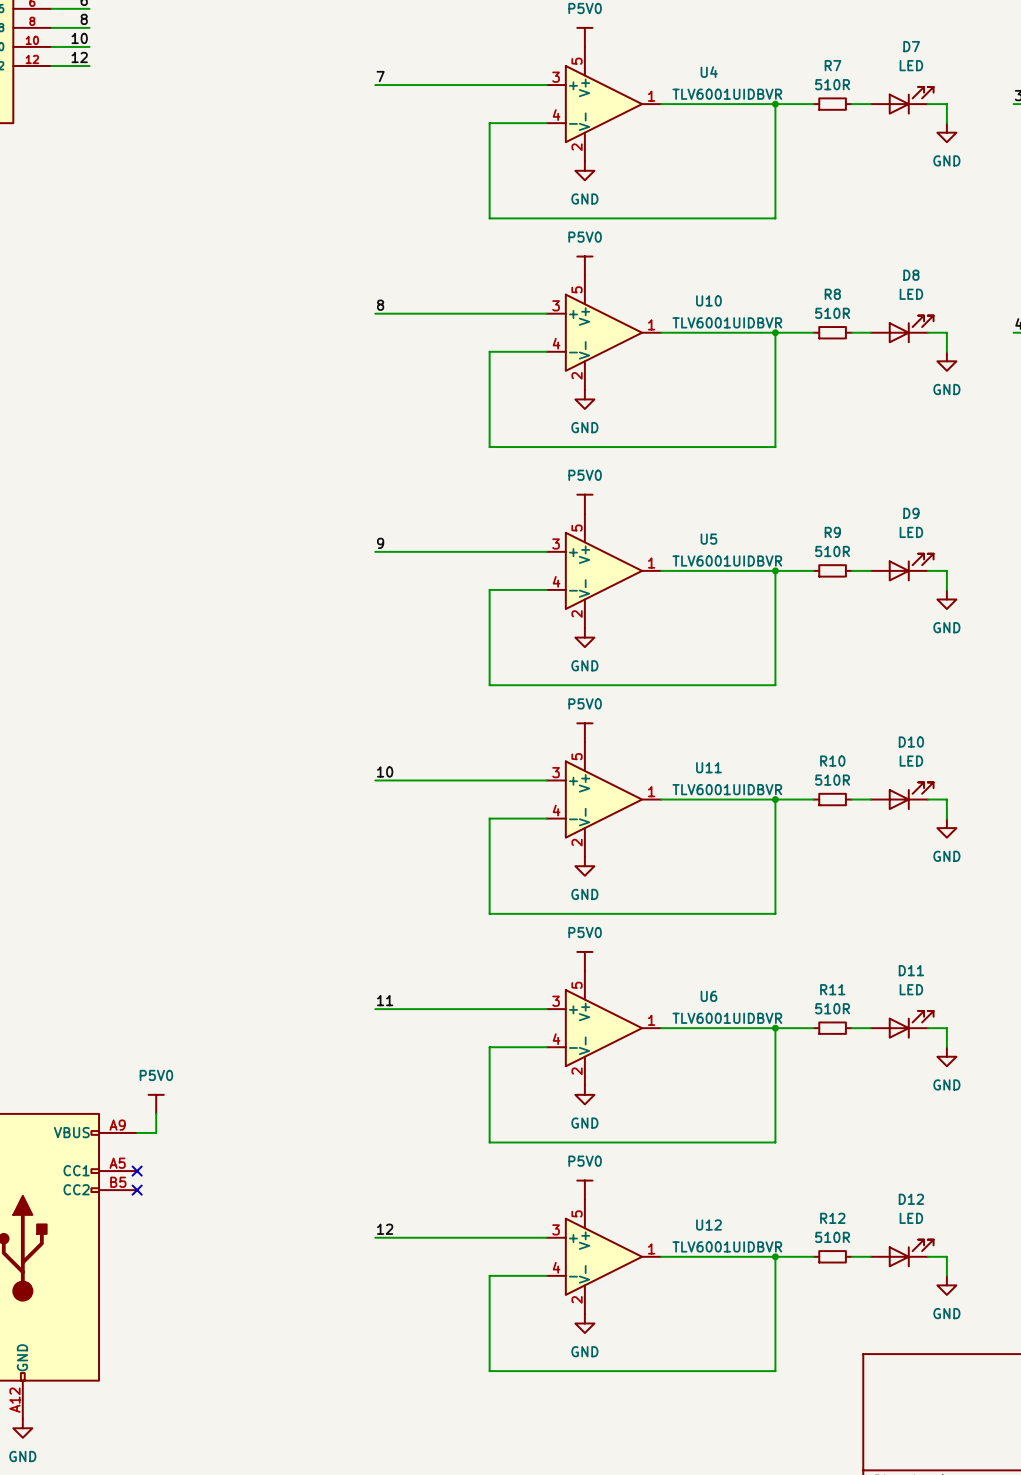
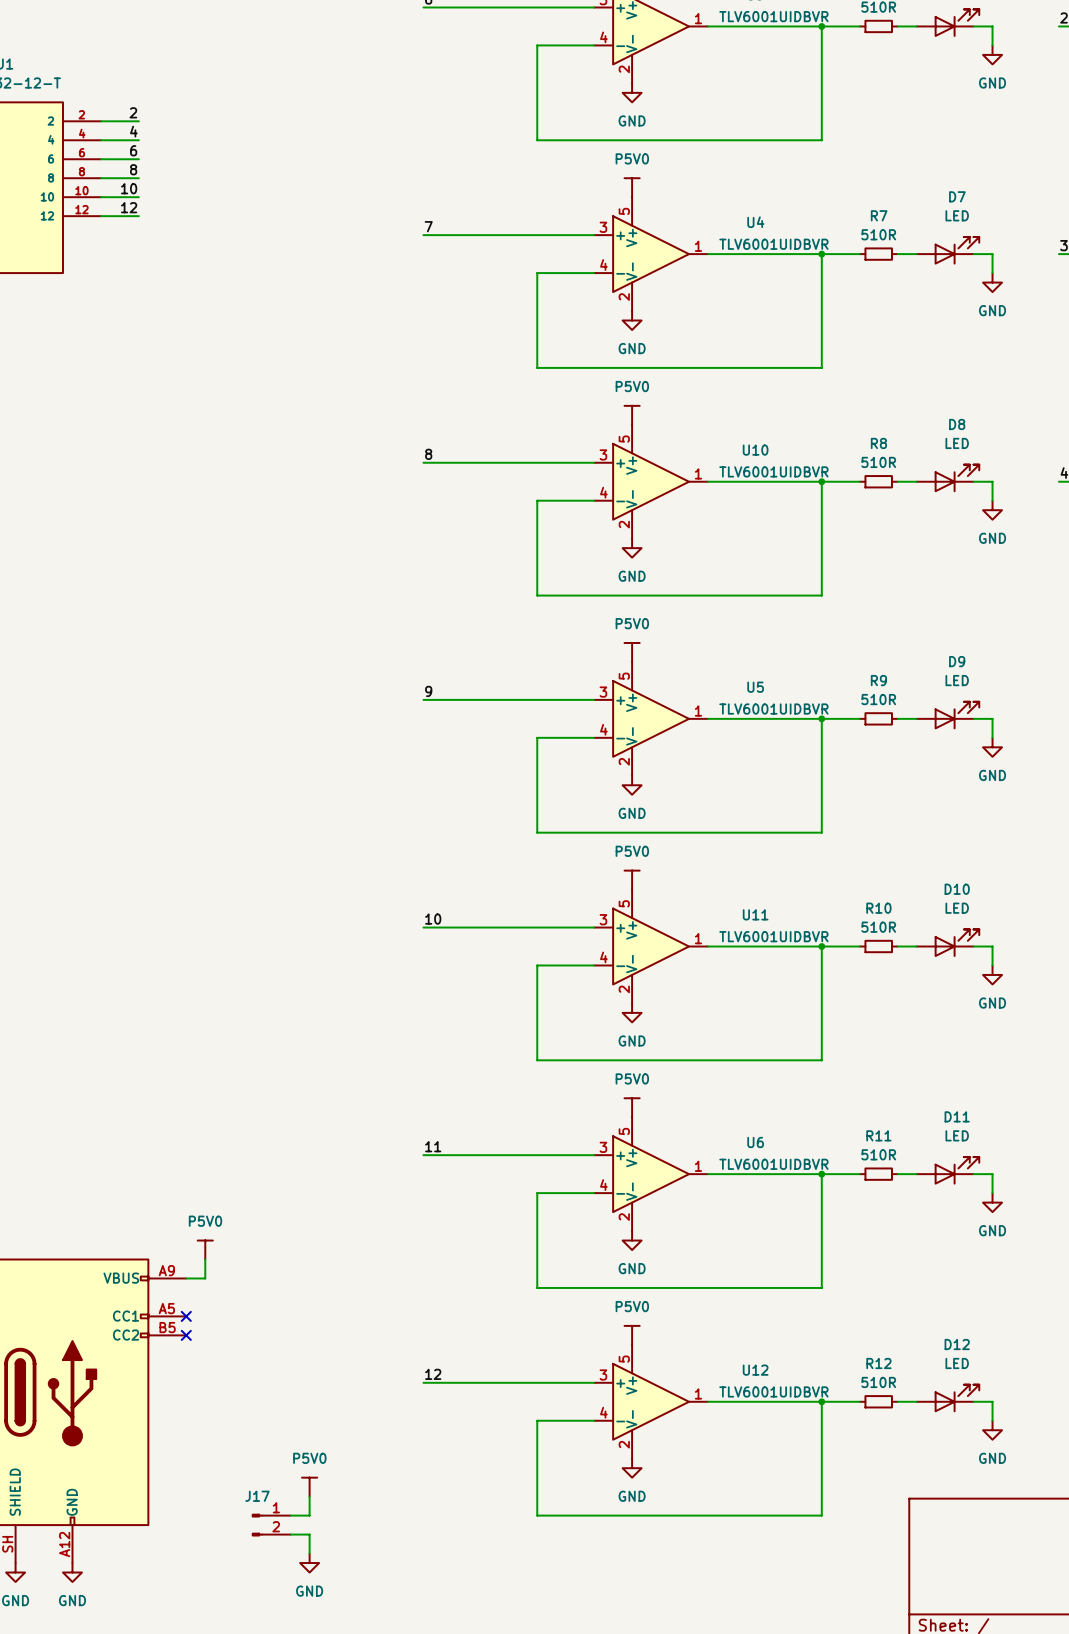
power symbol: none -> P5V0 (309, 1487)
wire: none -> (309, 1496) (309, 1515) (290, 1515)
J17: none -> (271, 1525)
wire: none -> (290, 1534) (309, 1534) (309, 1553)
power symbol: none -> GND (309, 1563)

